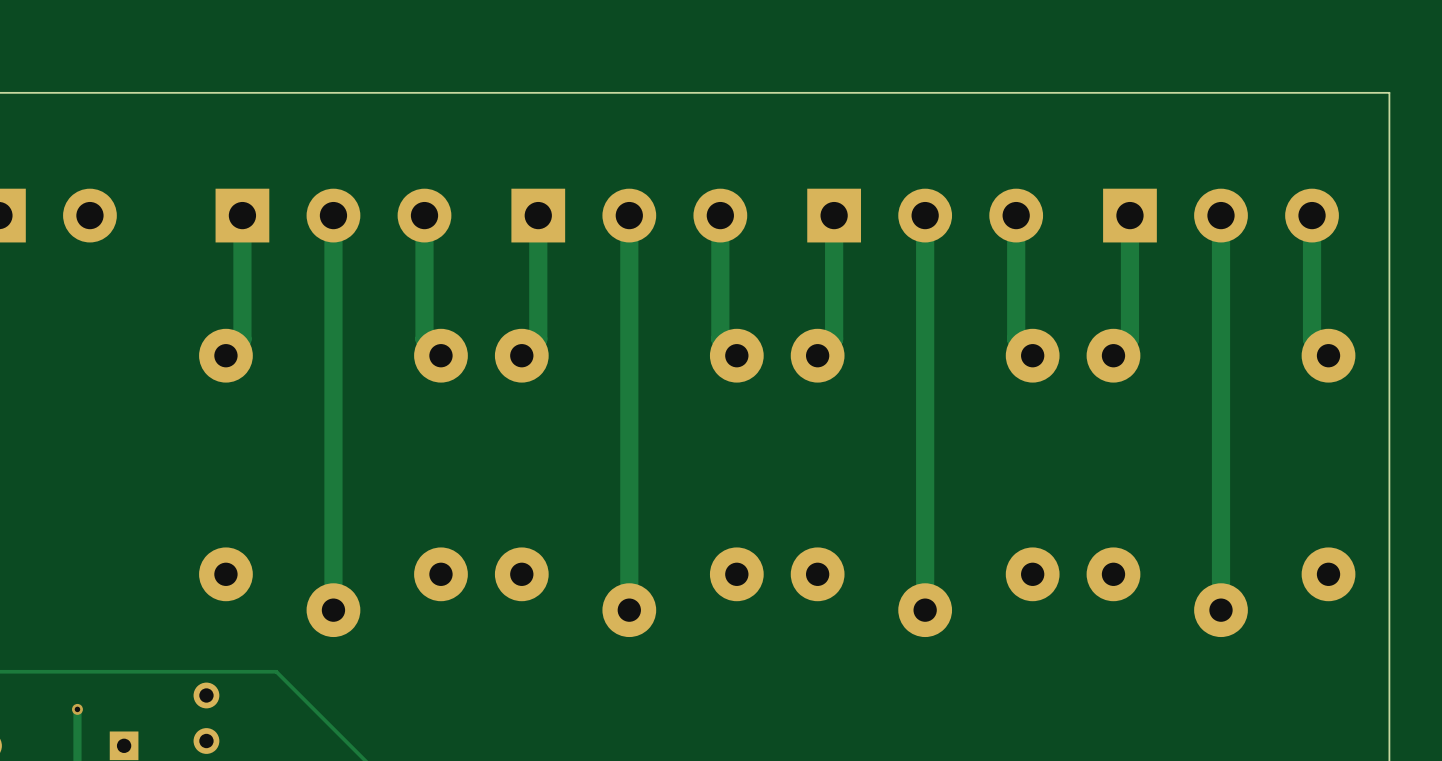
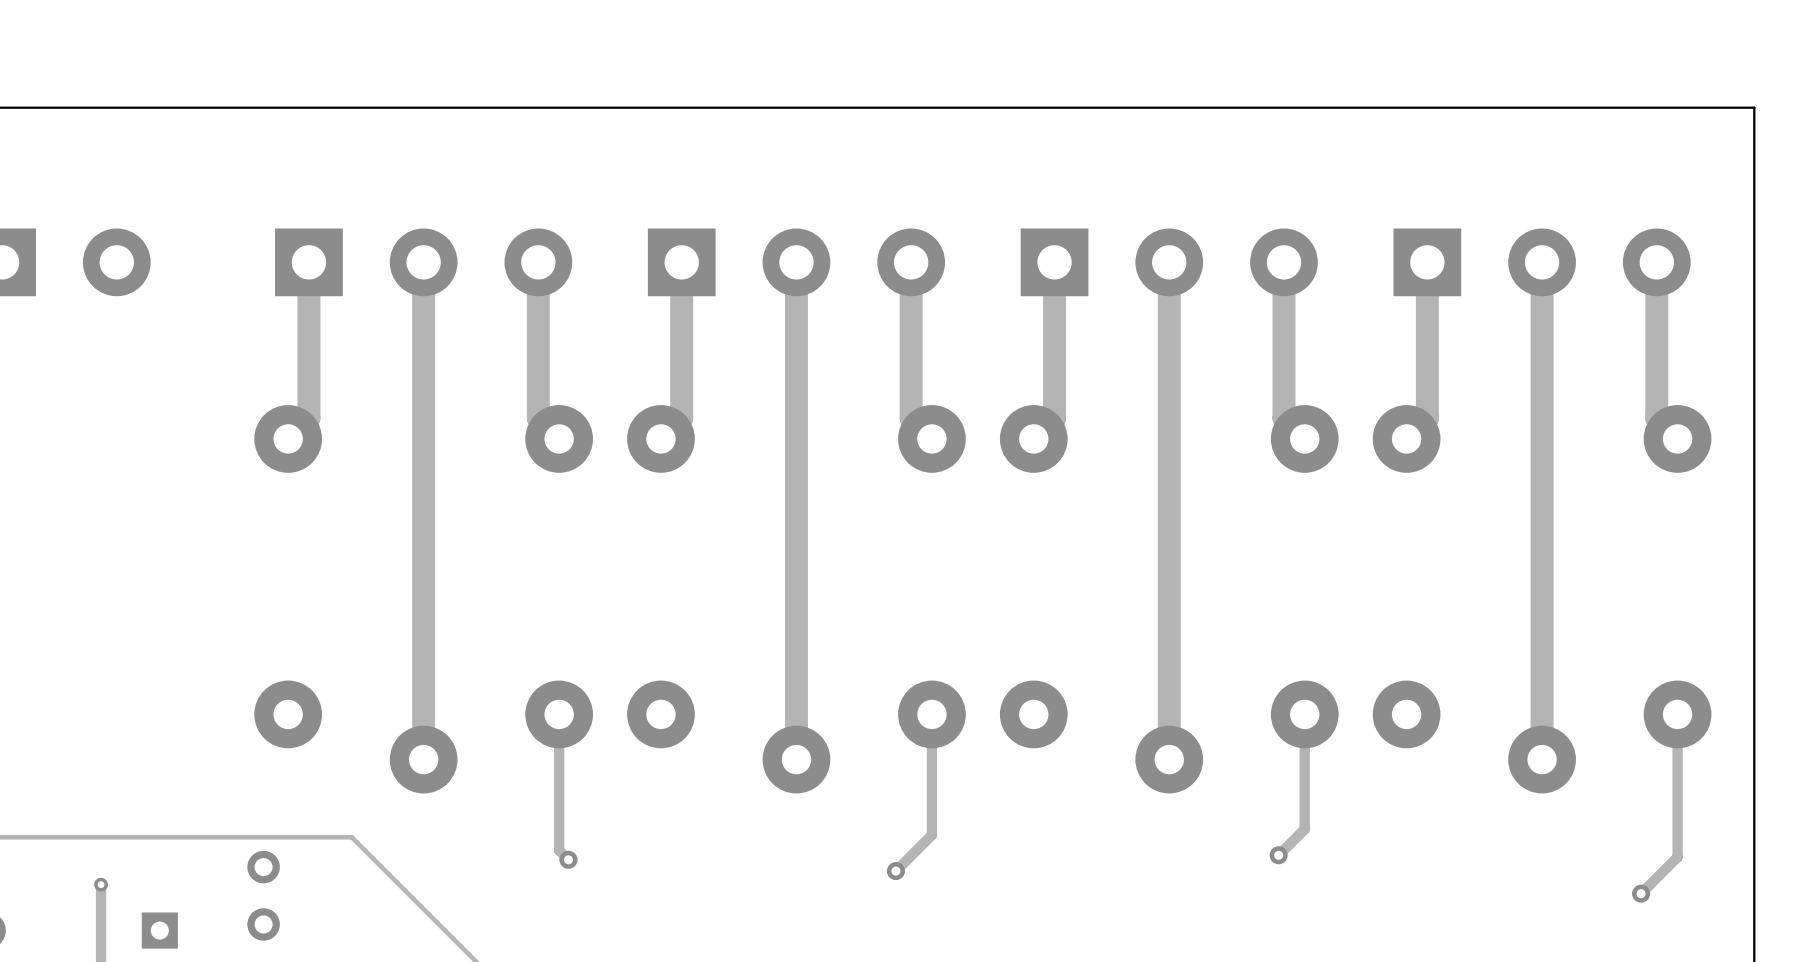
track: none -> (559, 714) (559, 850) (568, 859)
track: none -> (931, 714) (931, 835) (895, 871)
track: none -> (1304, 714) (1304, 829) (1278, 855)
track: none -> (1677, 714) (1677, 857) (1641, 893)
via: none -> (1278, 855)
via: none -> (568, 859)
via: none -> (895, 871)
via: none -> (1641, 893)

